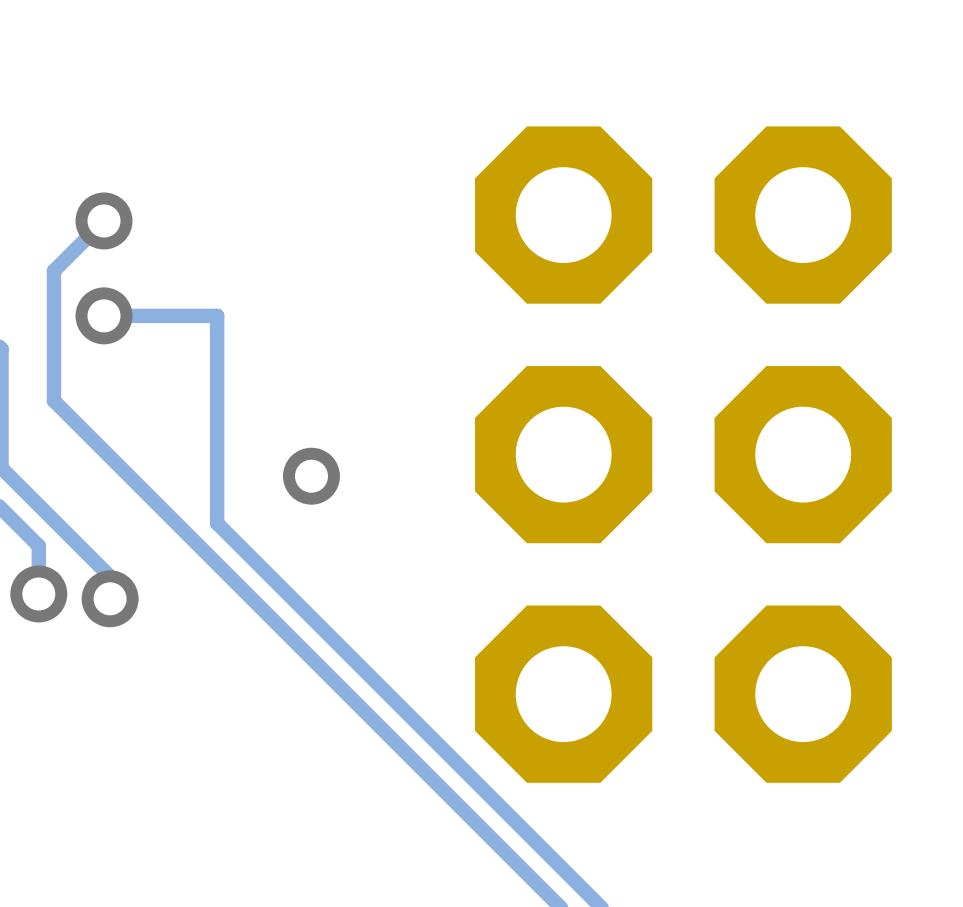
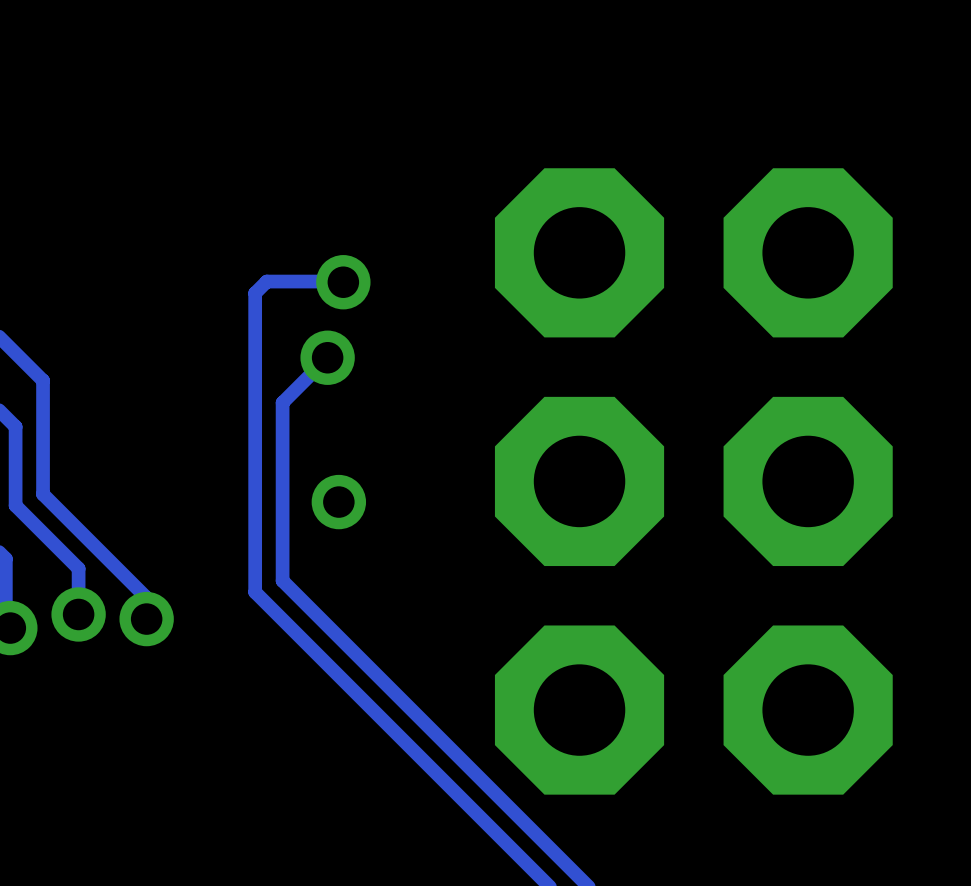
track: (104, 220) (53, 271) (53, 400) (223, 570) -> (343, 282) (266, 281) (255, 293) (255, 592)
via: (104, 220) -> none
via: none -> (343, 282)
track: (104, 315) (217, 315) (217, 523) (252, 558) -> (327, 357) (282, 402) (282, 580)
via: (104, 315) -> none
via: none -> (327, 357)

